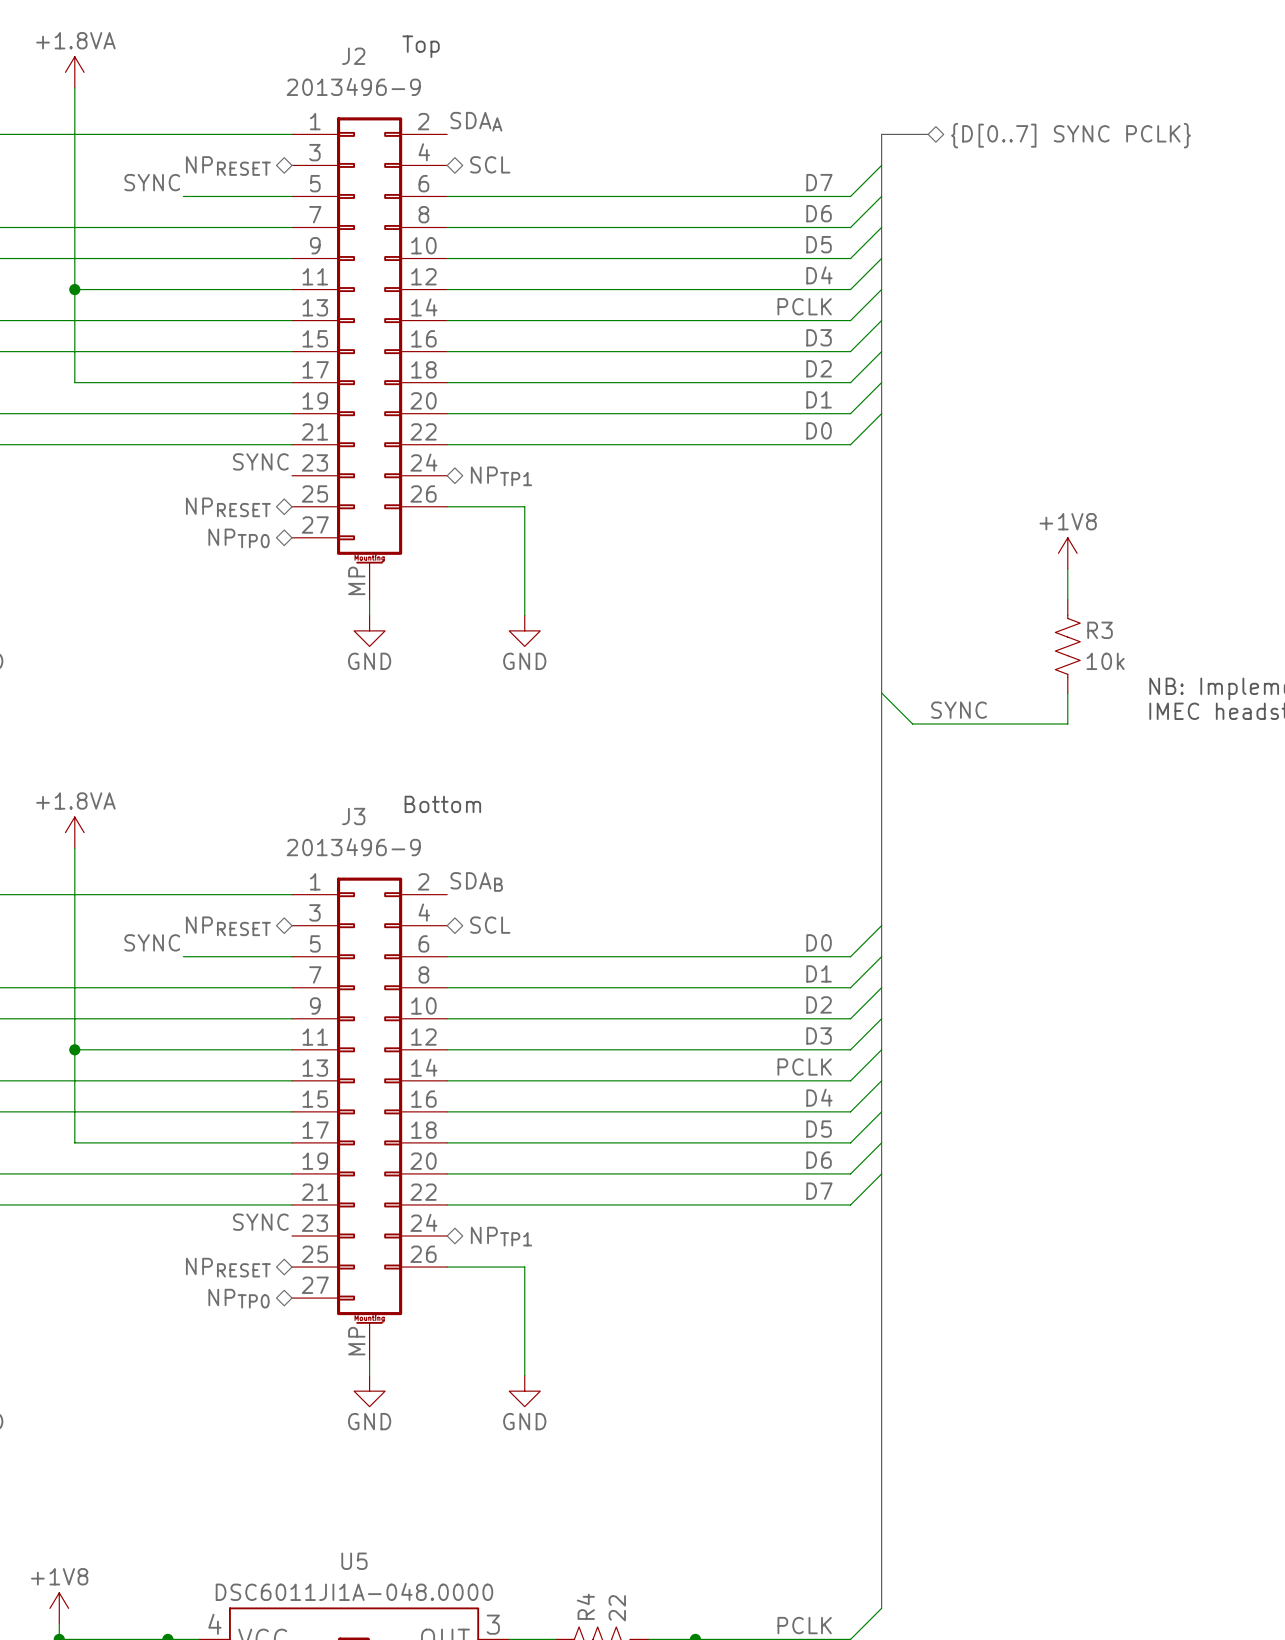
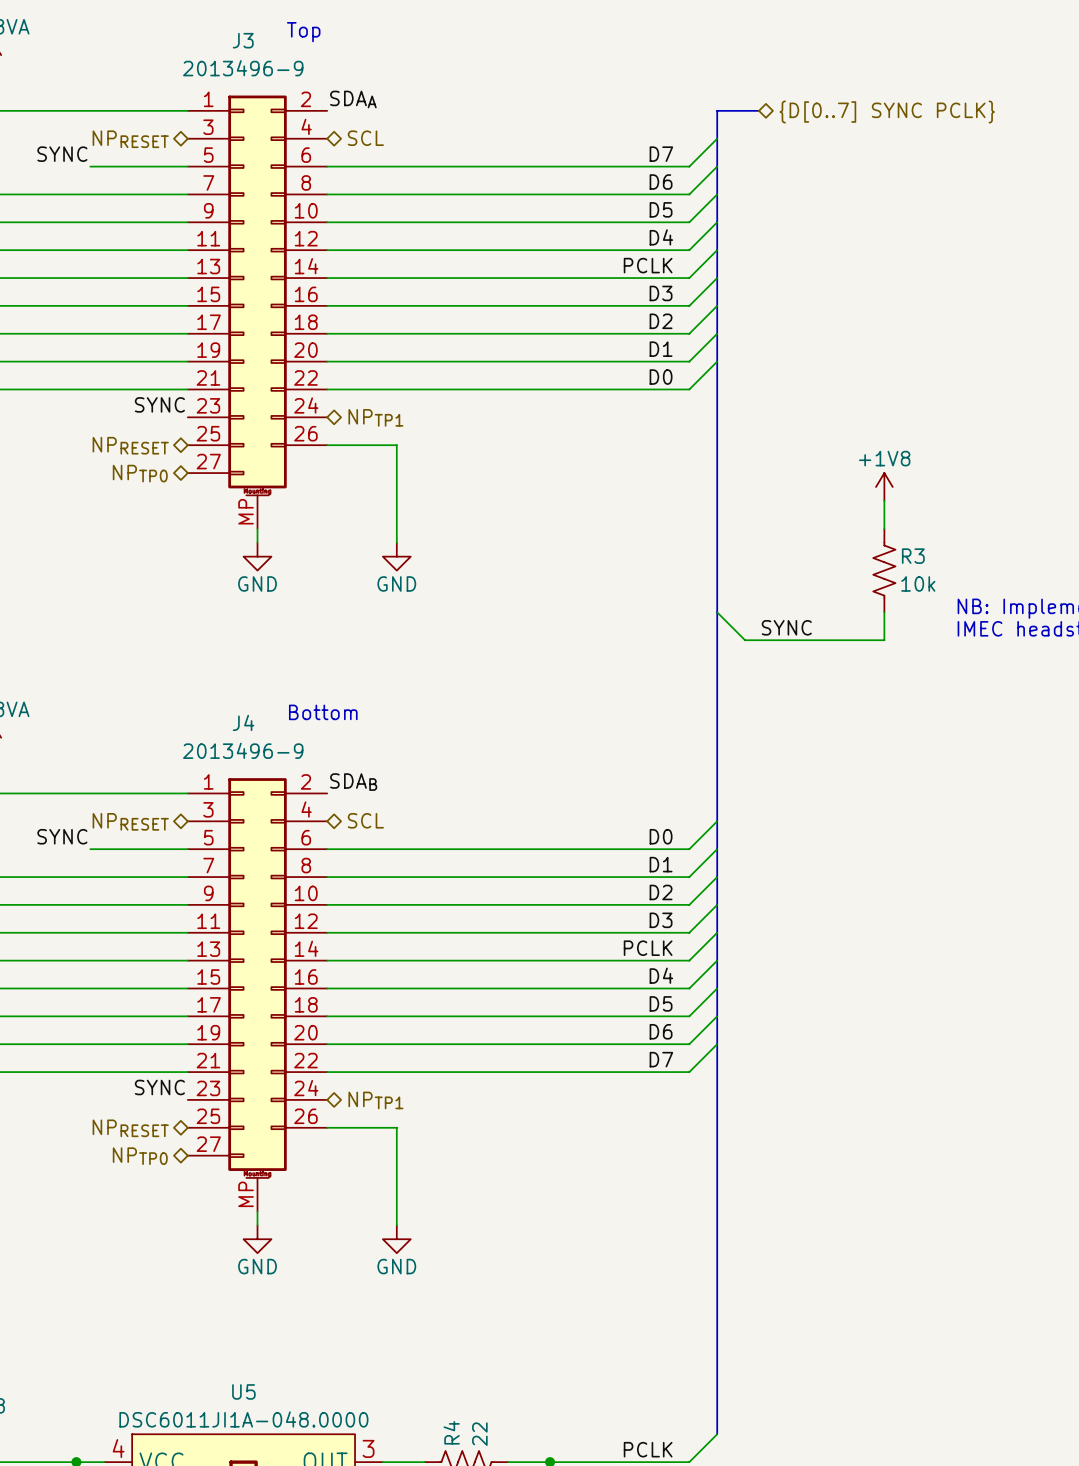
J2 name: J2 (353, 56) -> J3 (243, 40)
J3 name: J3 (353, 816) -> J4 (243, 722)

